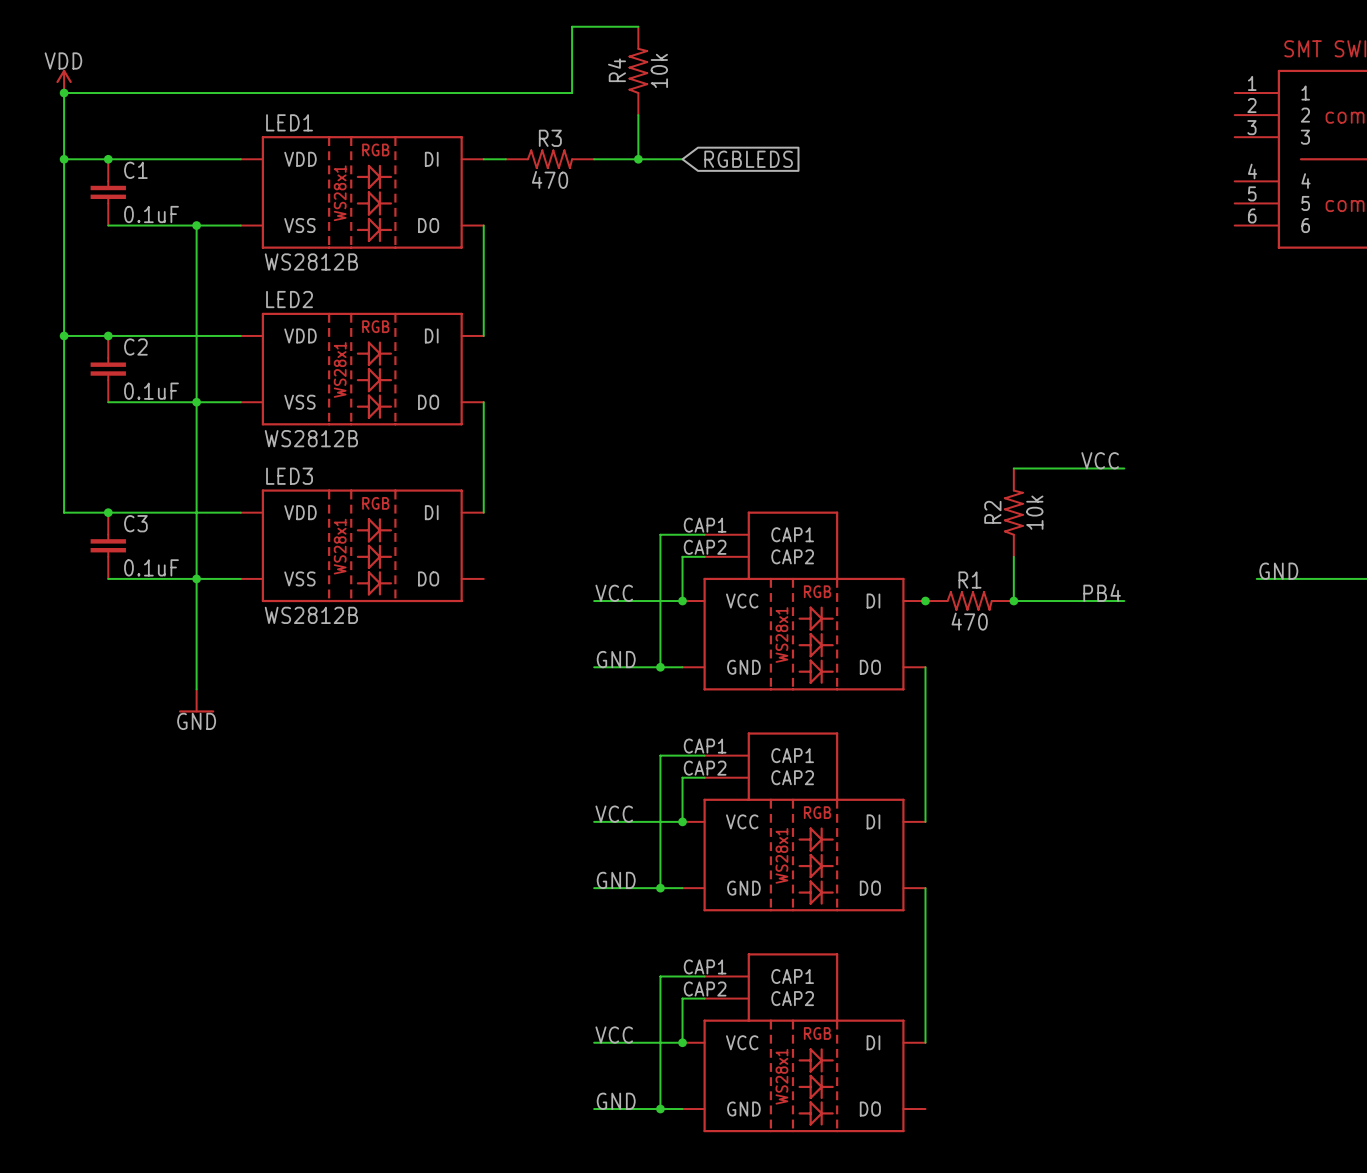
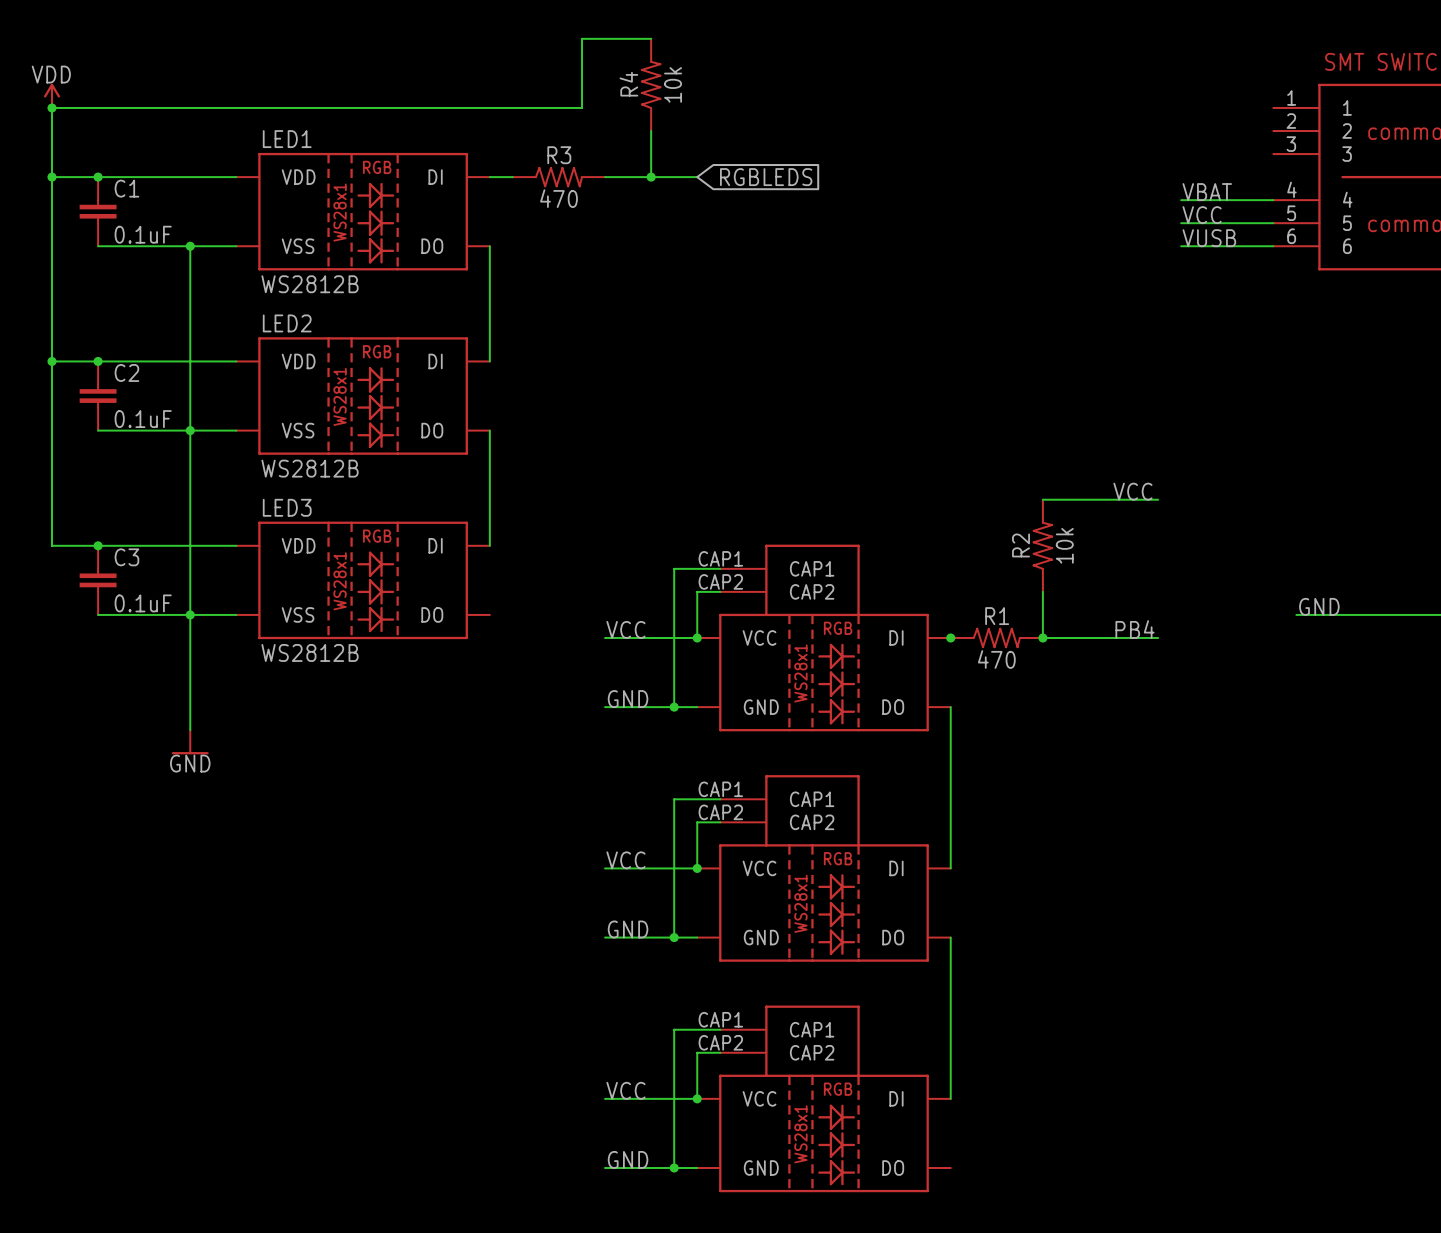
label: none -> VBAT (1207, 192)
wire: none -> (1181, 200) (1273, 200)
label: none -> VCC (1202, 215)
wire: none -> (1181, 223) (1273, 223)
label: none -> VUSB (1209, 238)
wire: none -> (1181, 246) (1273, 246)

